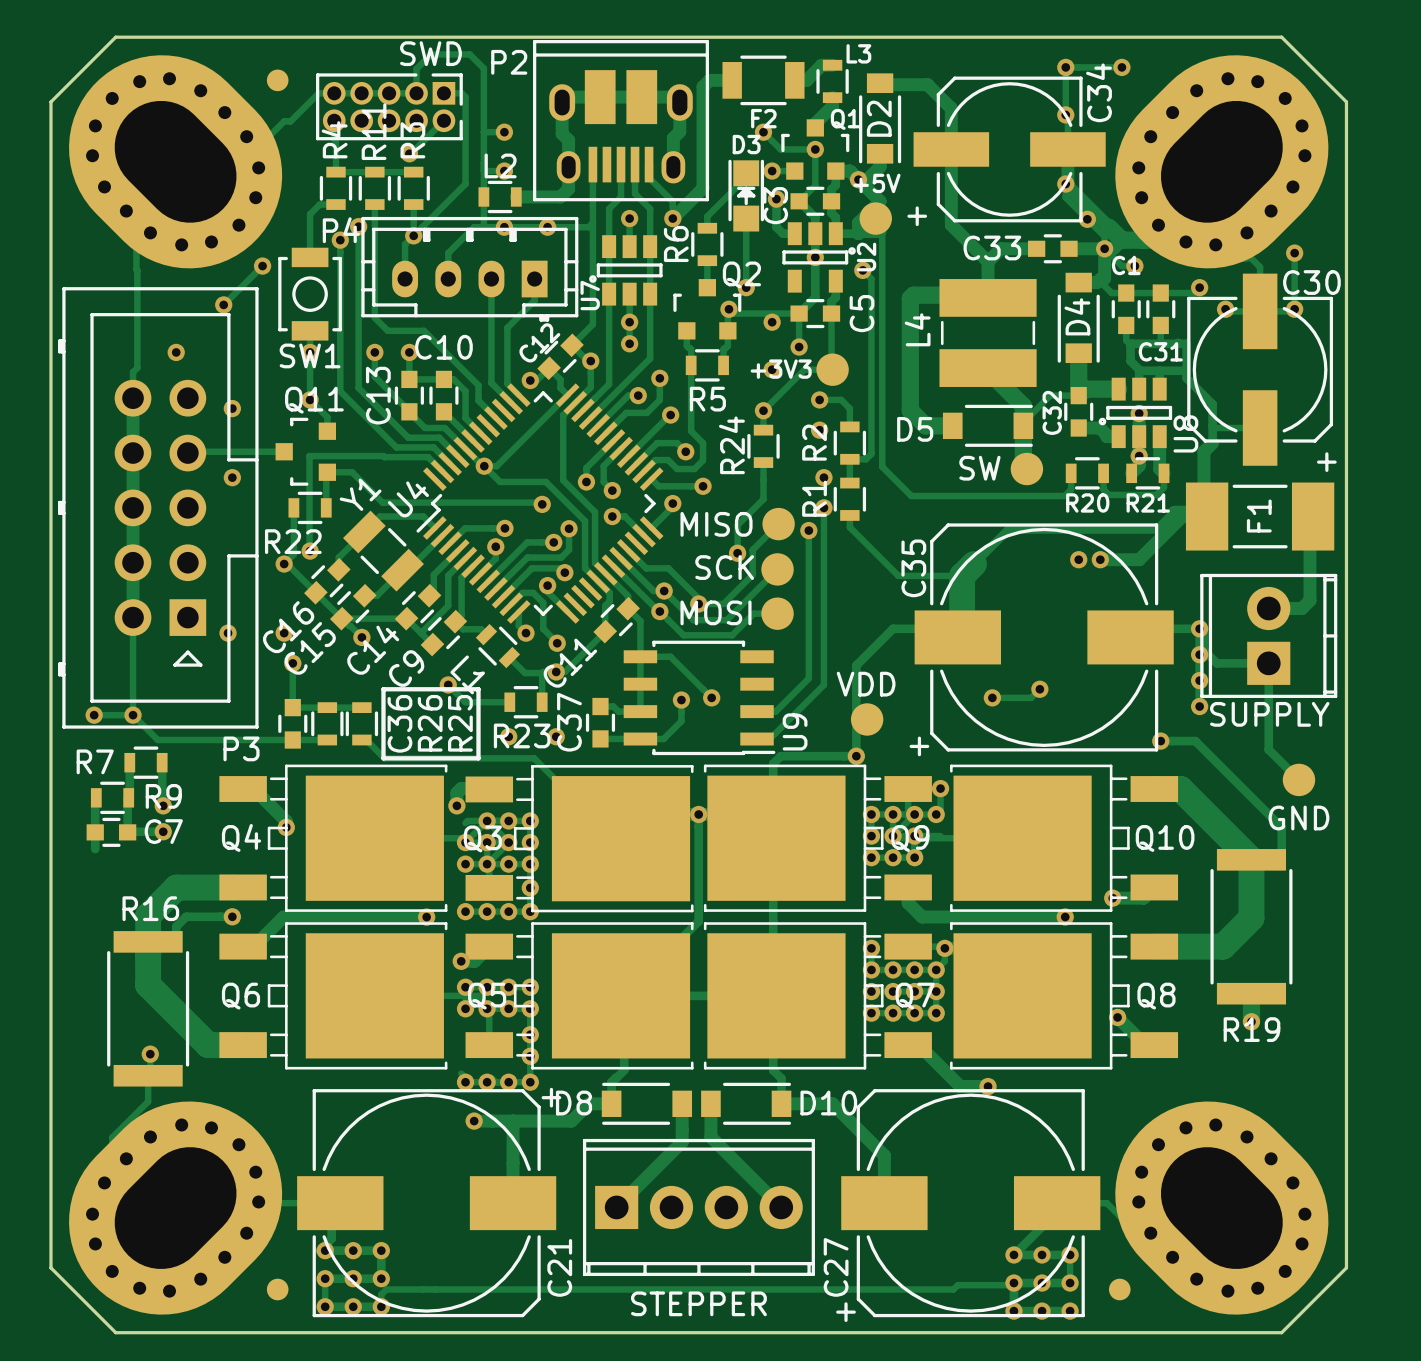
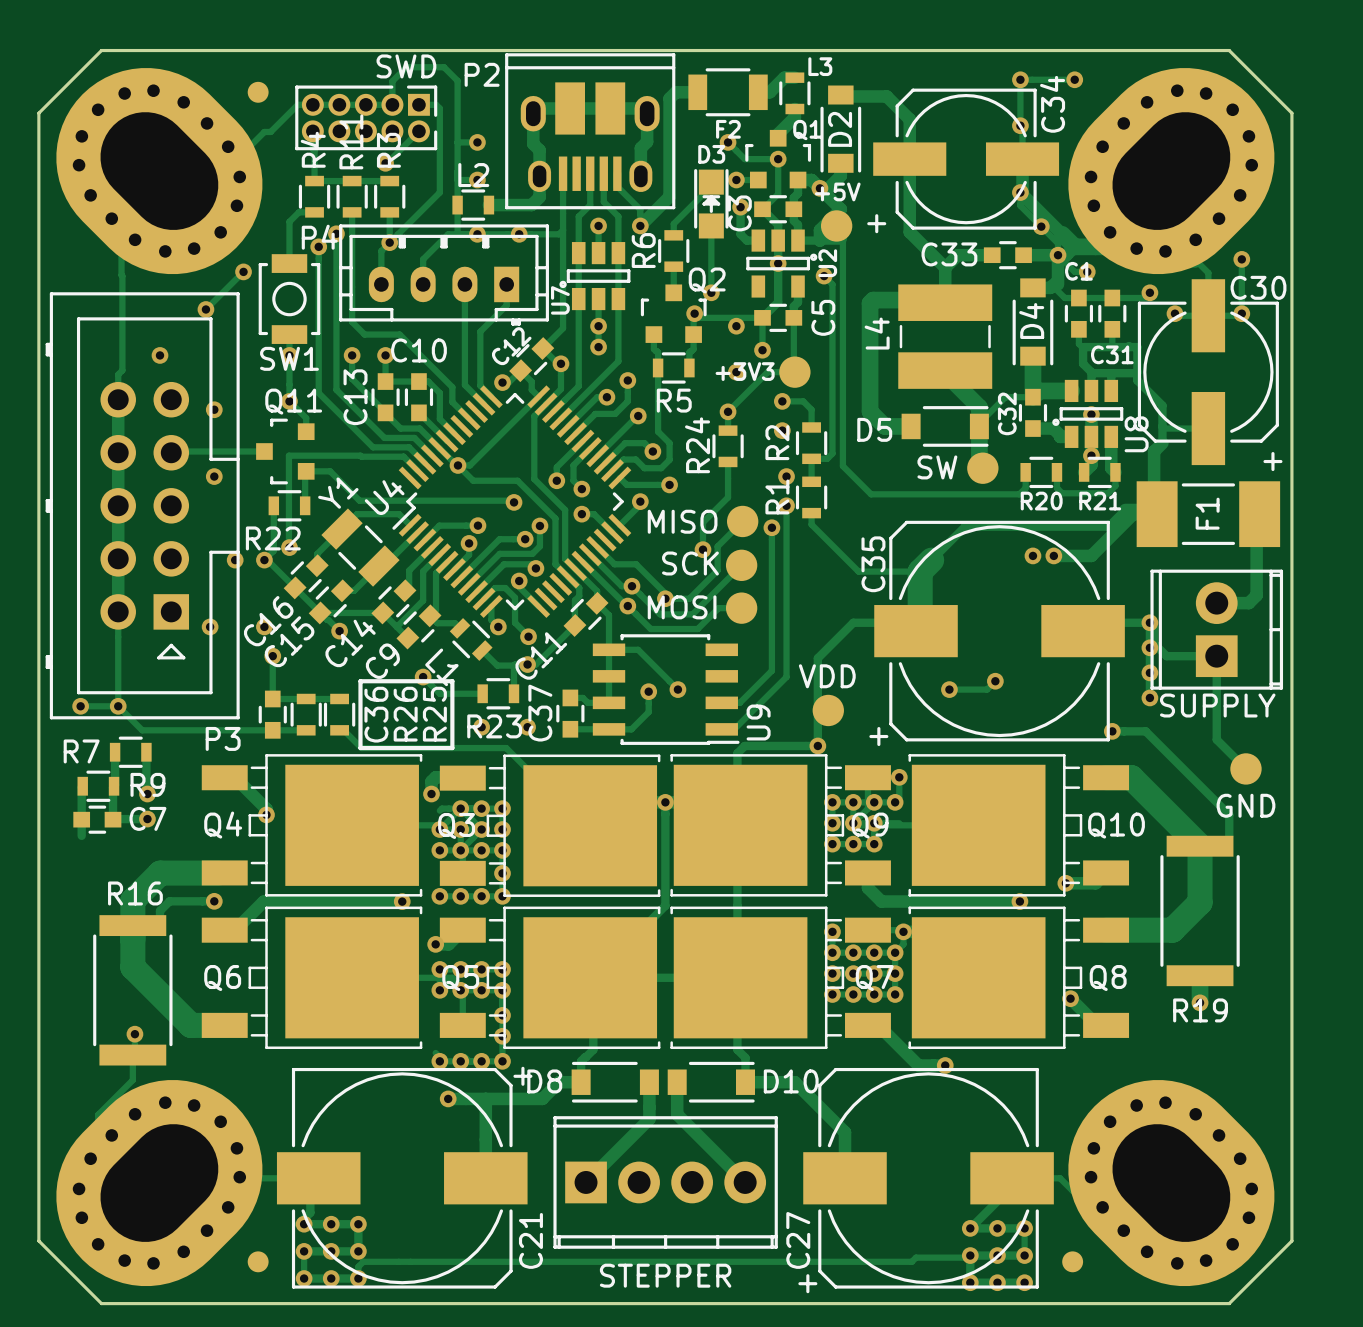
via: none -> (235, 560)

